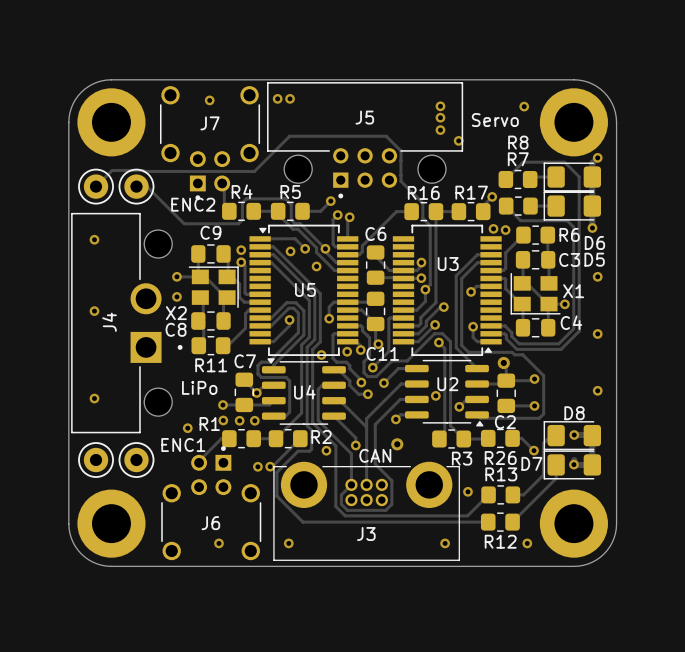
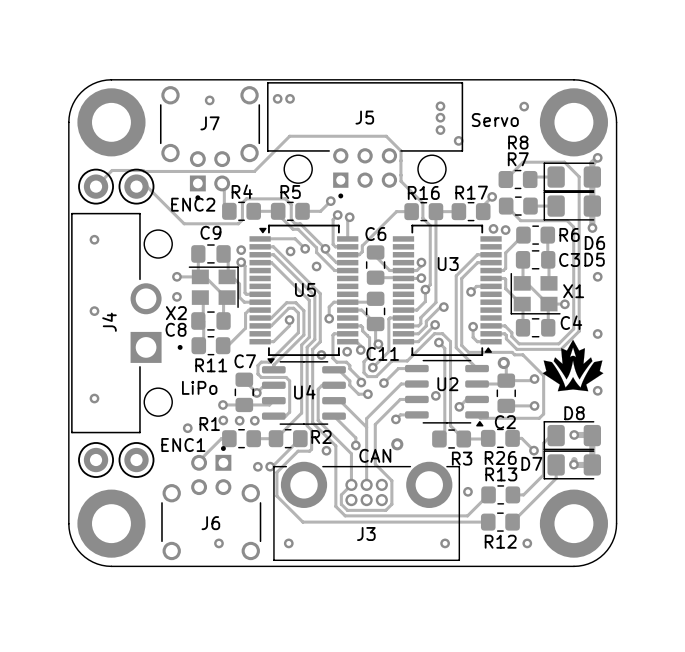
drawing: none -> [542, 339, 604, 392]

